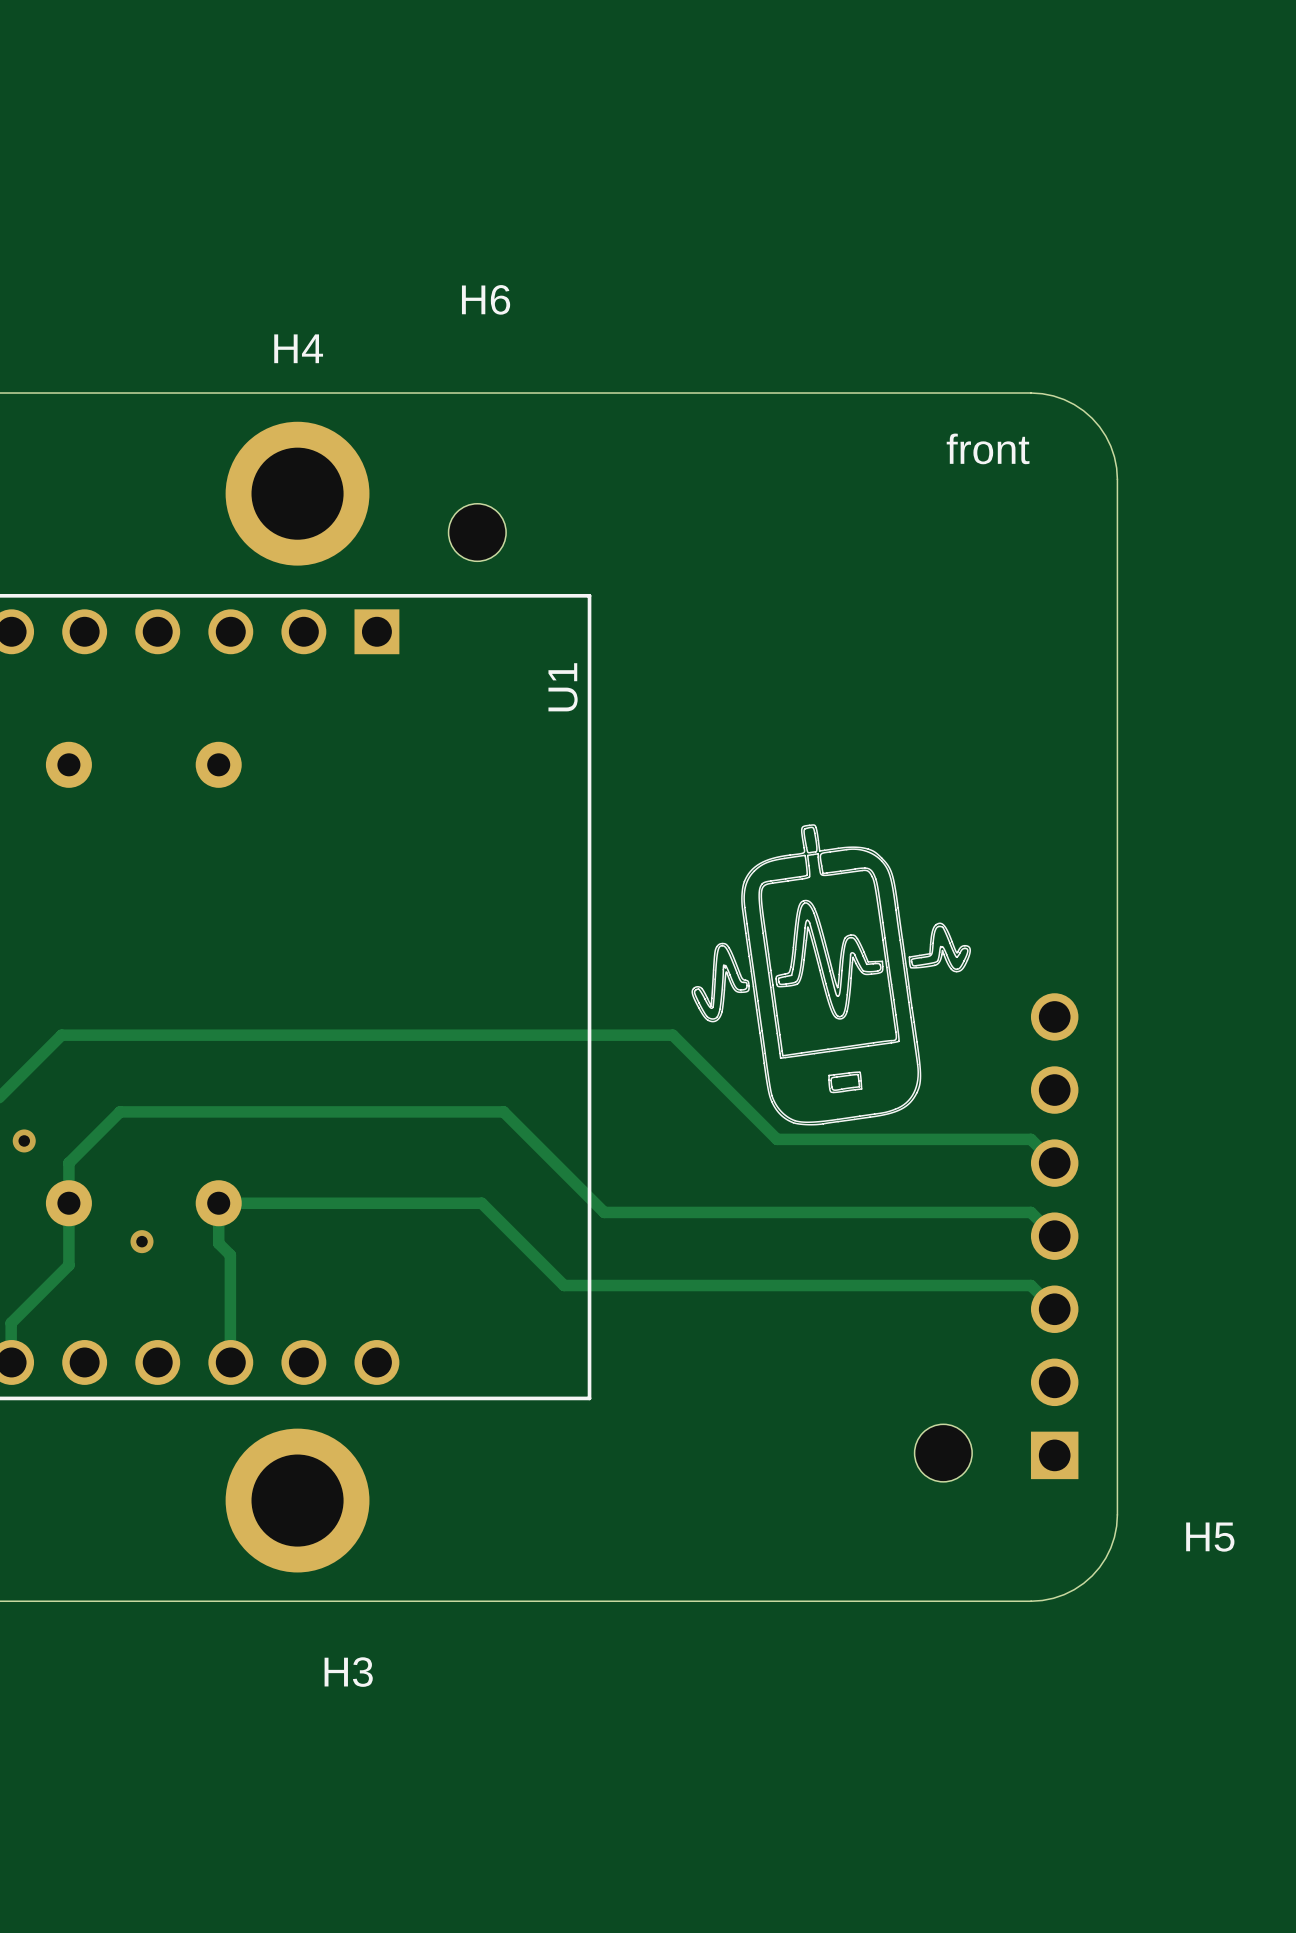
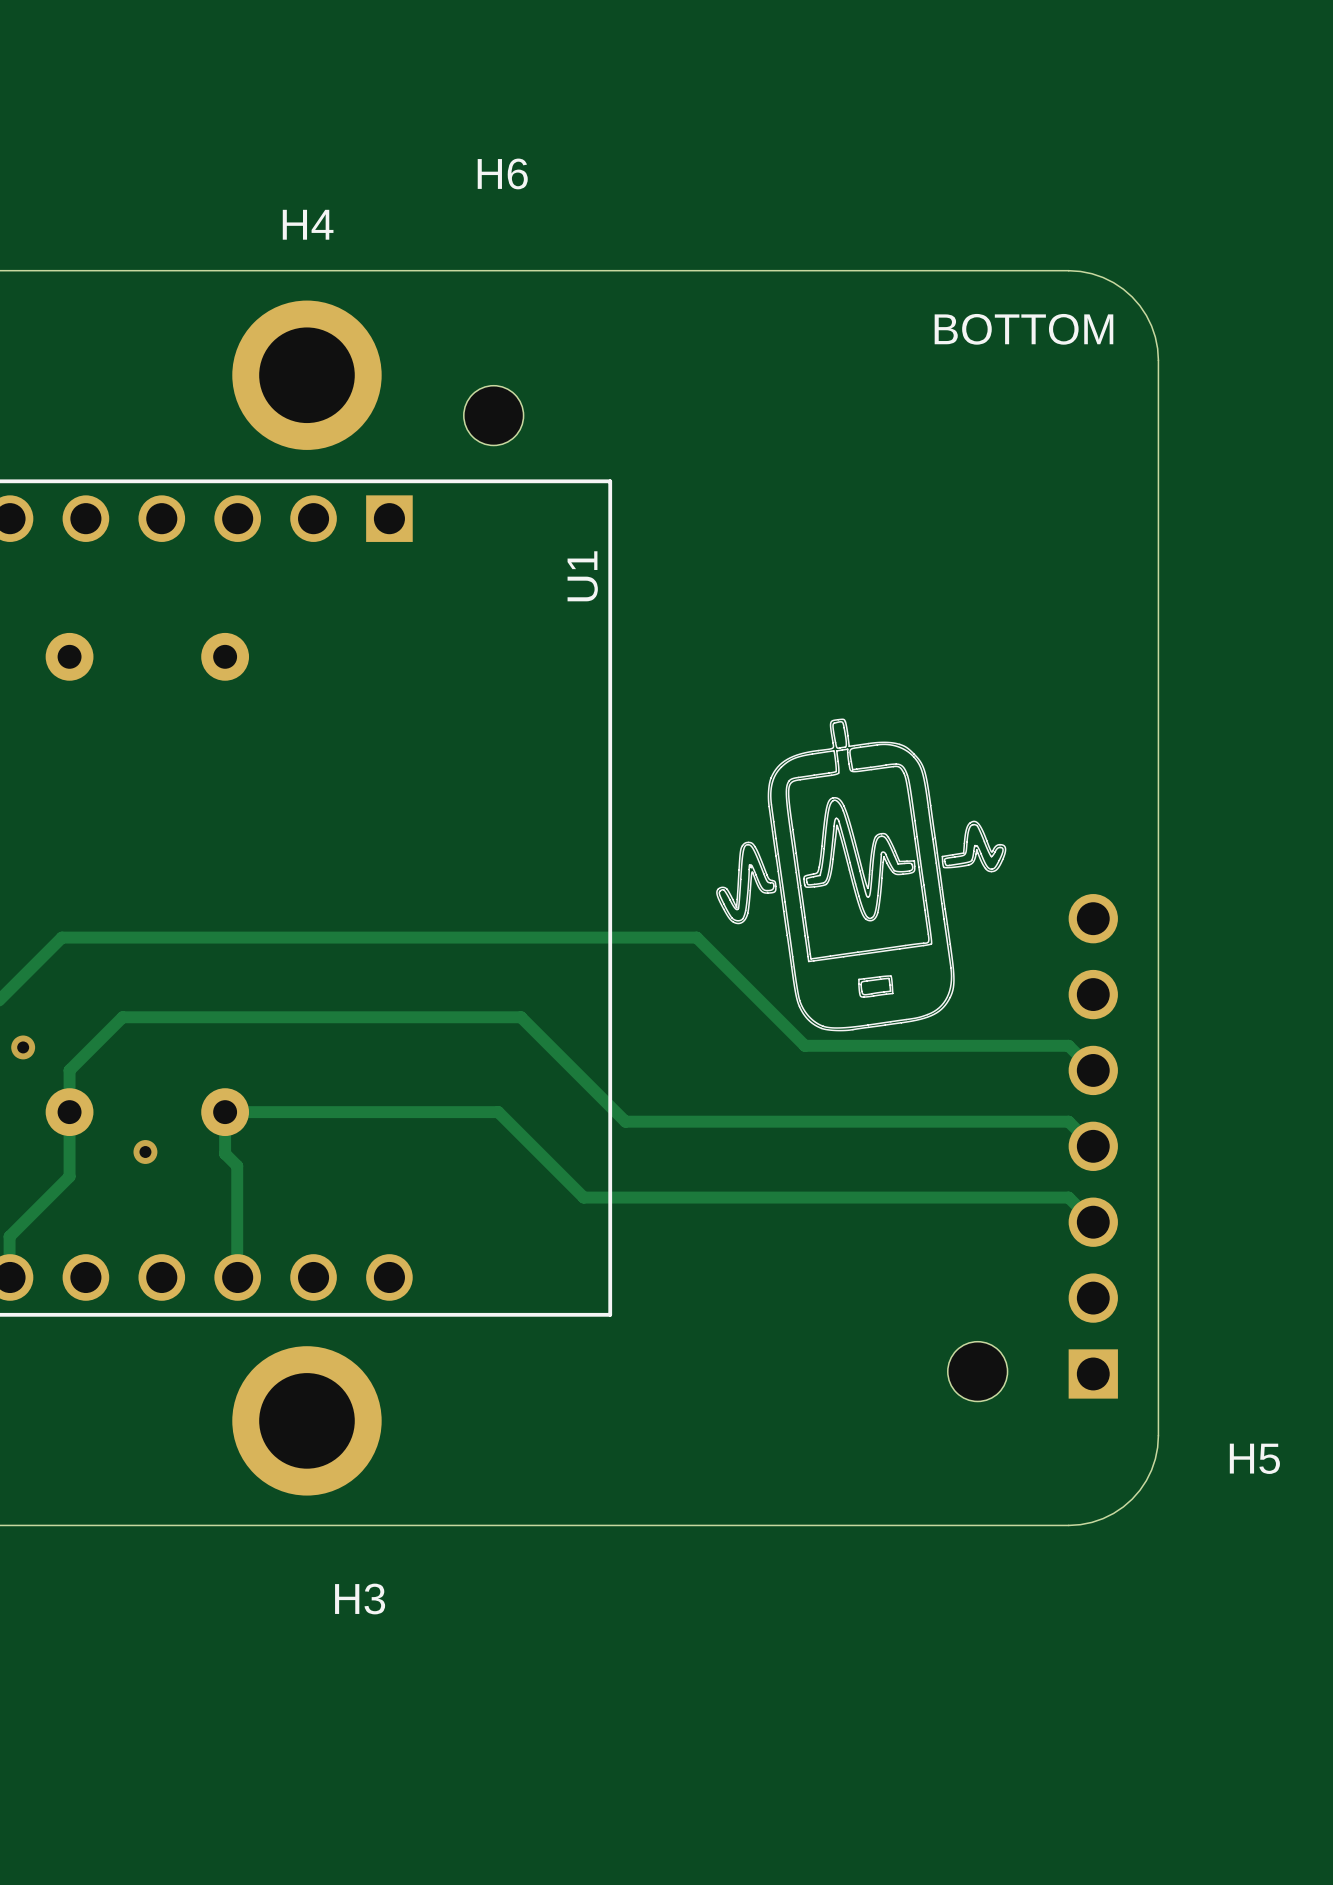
text: front (988, 448) -> BOTTOM (1023, 329)

